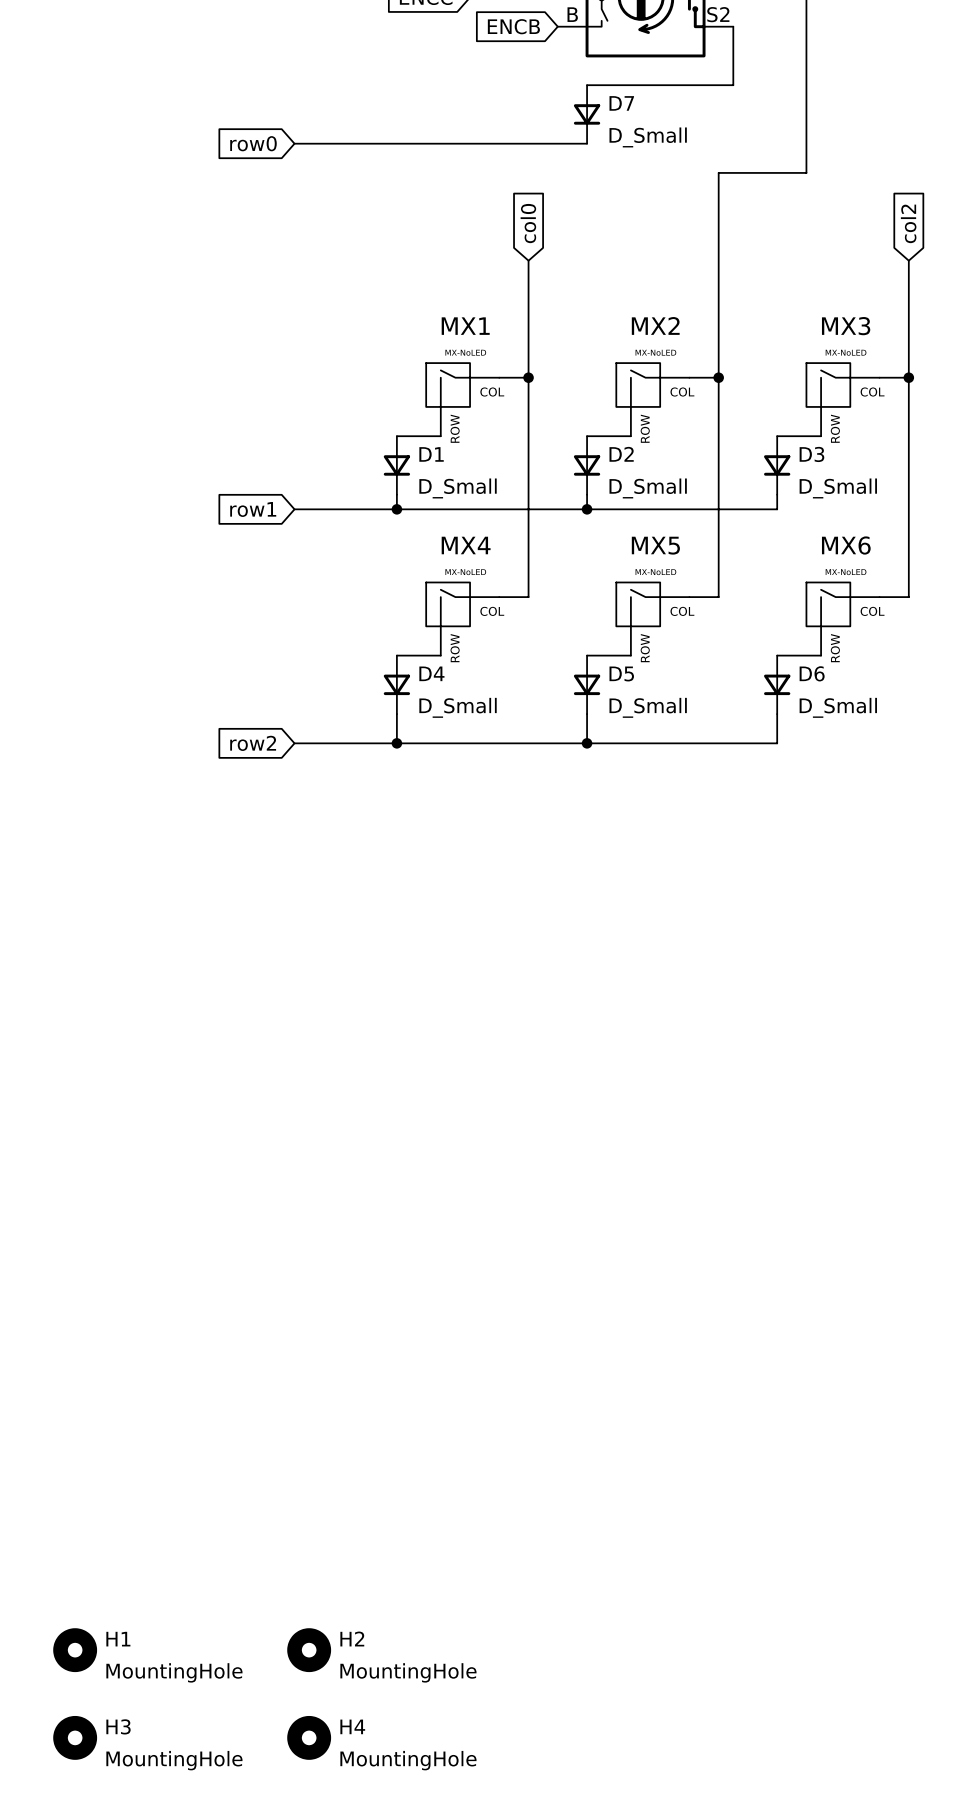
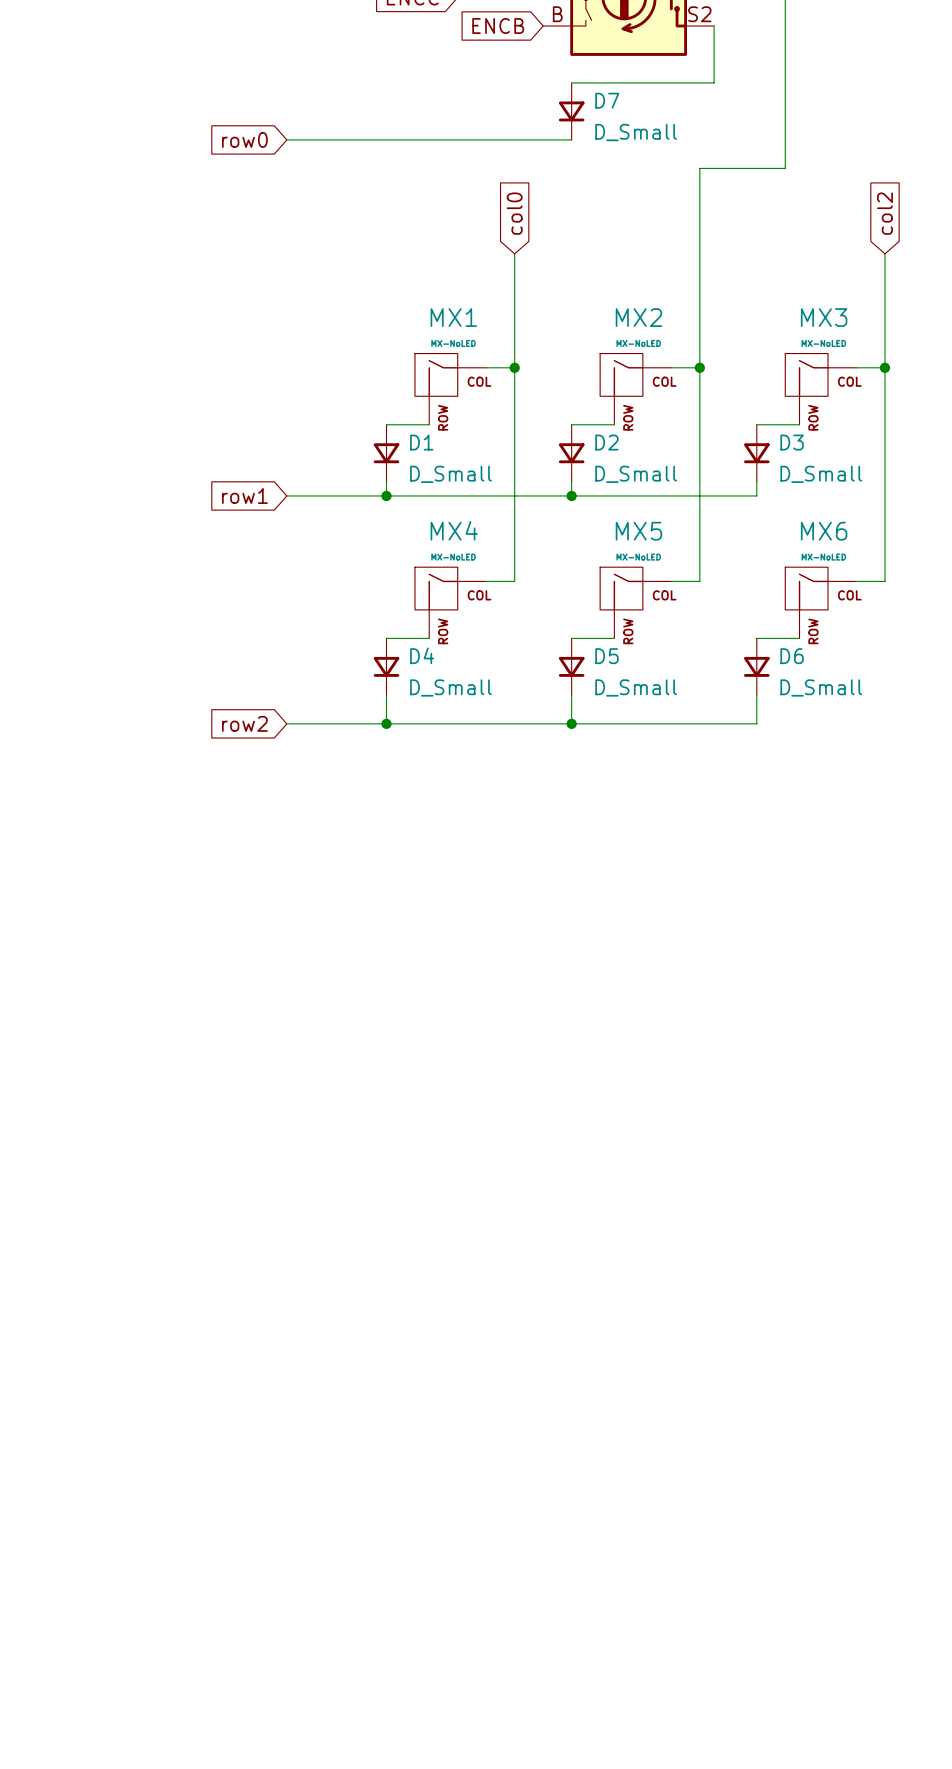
H1: MountingHole (75, 1650) -> none
H2: MountingHole (309, 1650) -> none
H3: MountingHole (75, 1737) -> none
H4: MountingHole (309, 1737) -> none

